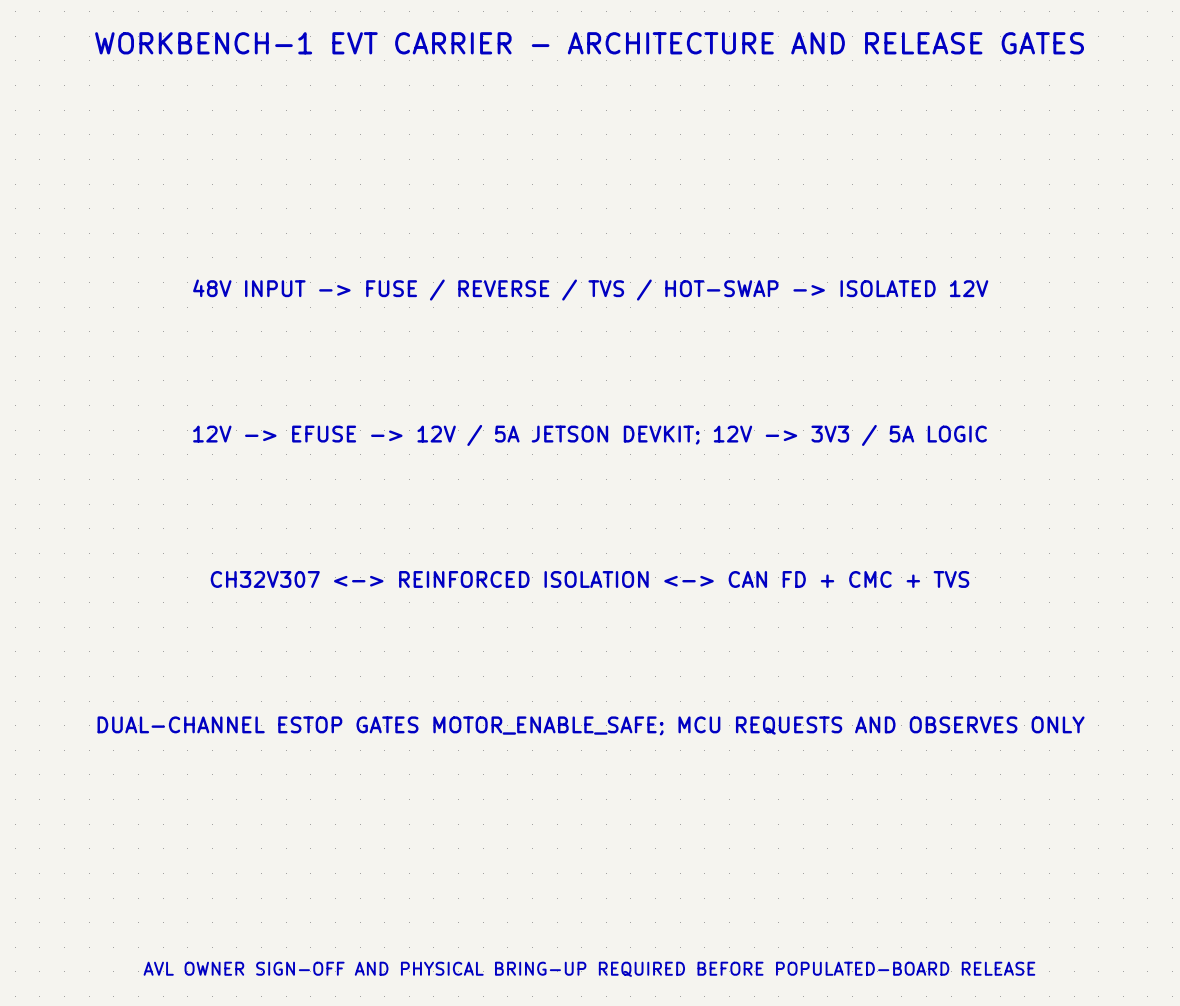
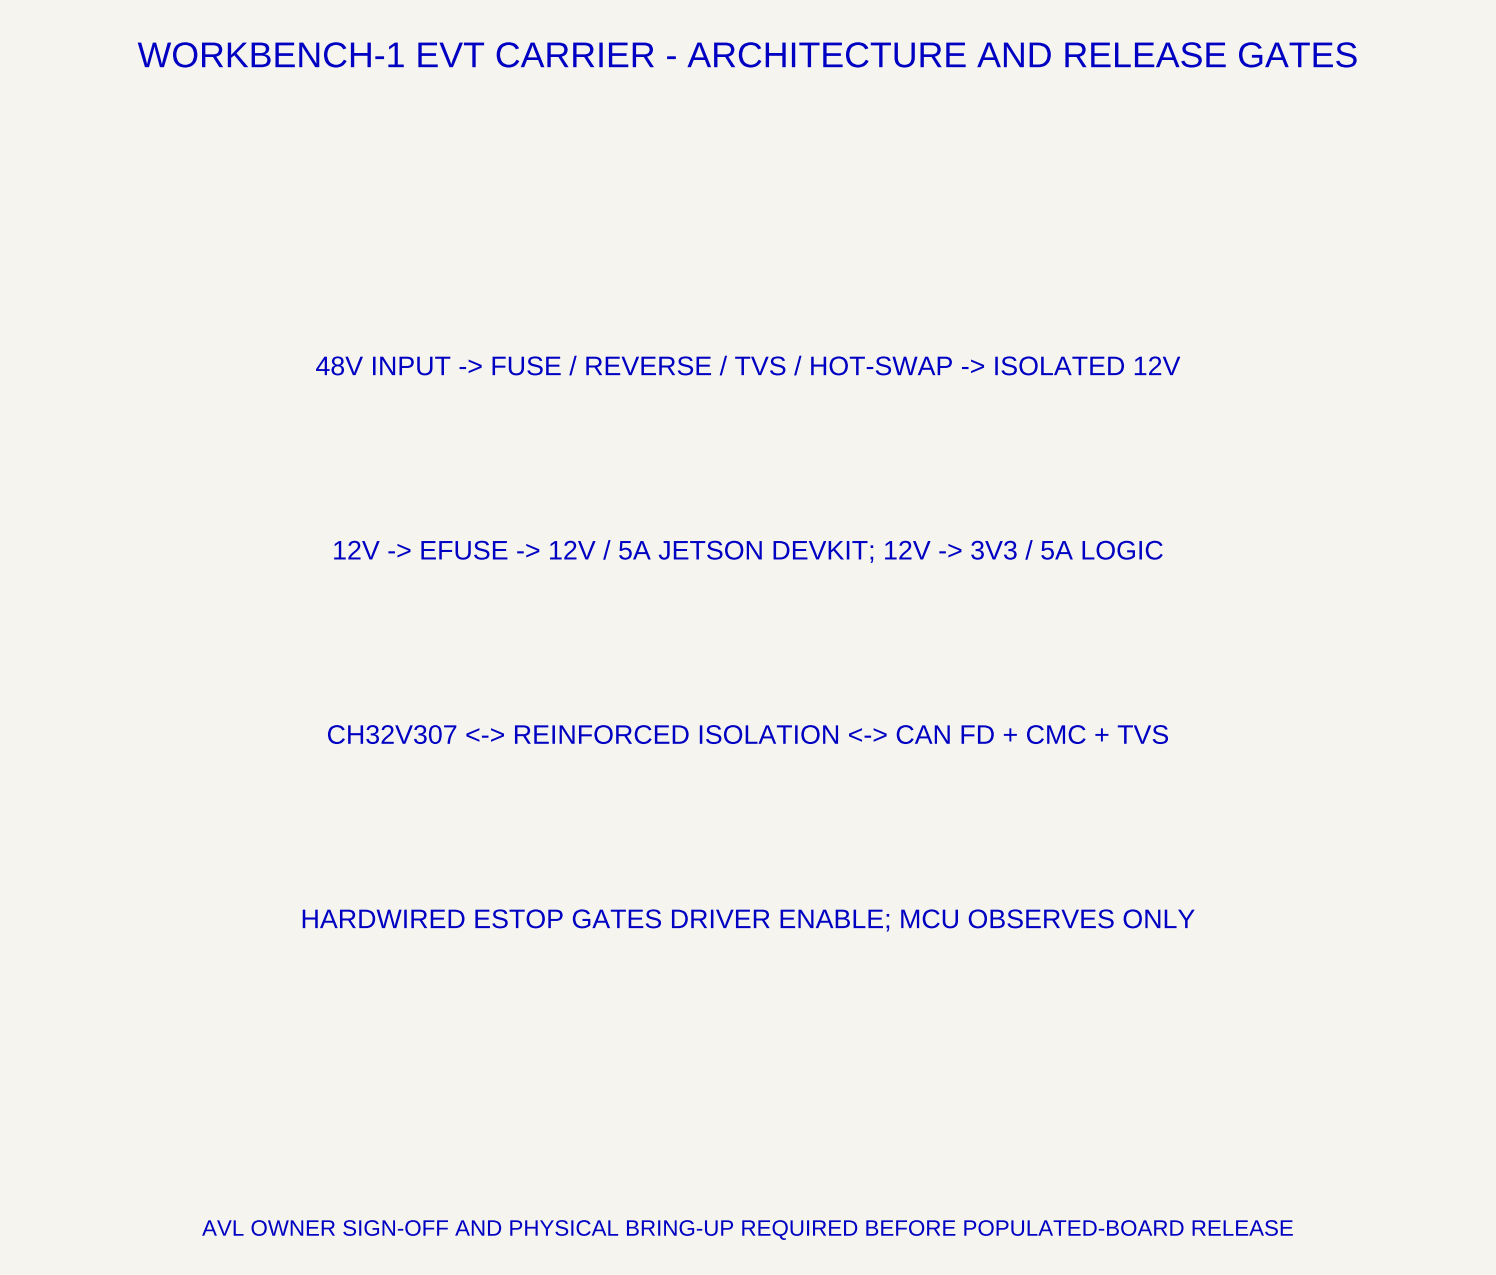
text: DUAL-CHANNEL ESTOP GATES MOTOR_ENABLE_SAFE; MCU REQUESTS AND OBSERVES ONLY (591, 725) -> HARDWIRED ESTOP GATES DRIVER ENABLE; MCU OBSERVES ONLY (748, 920)

